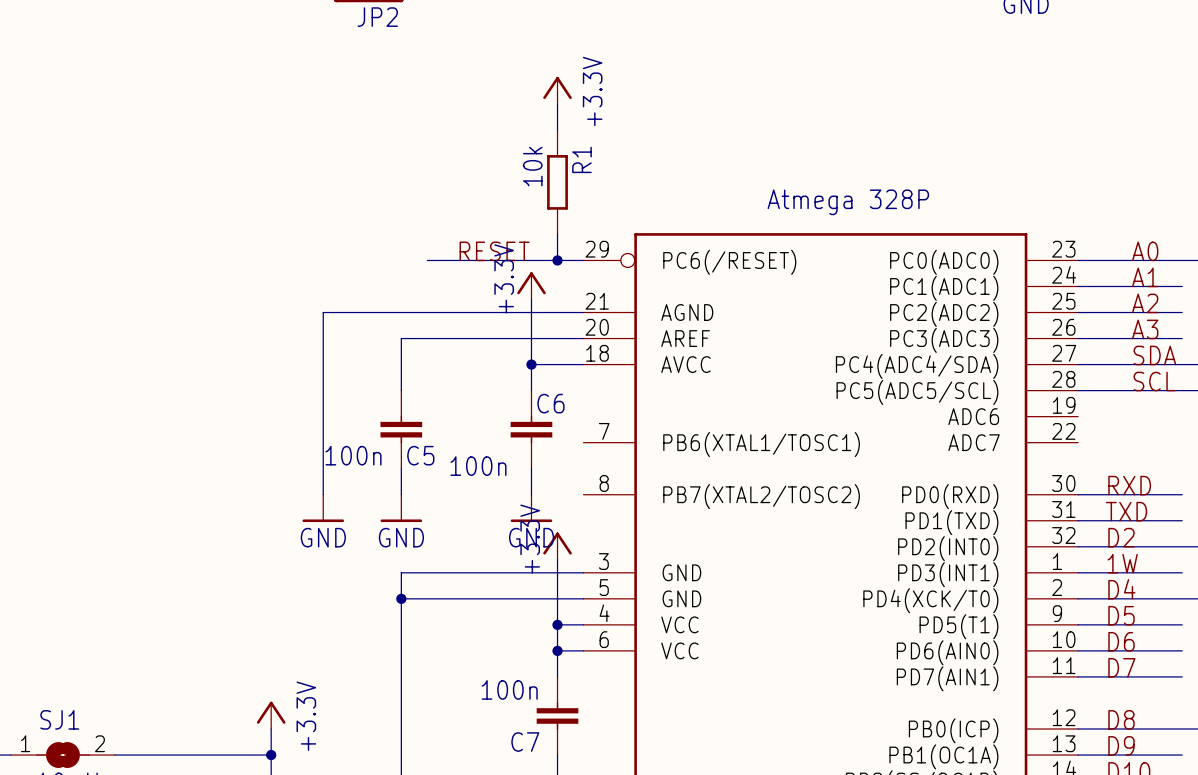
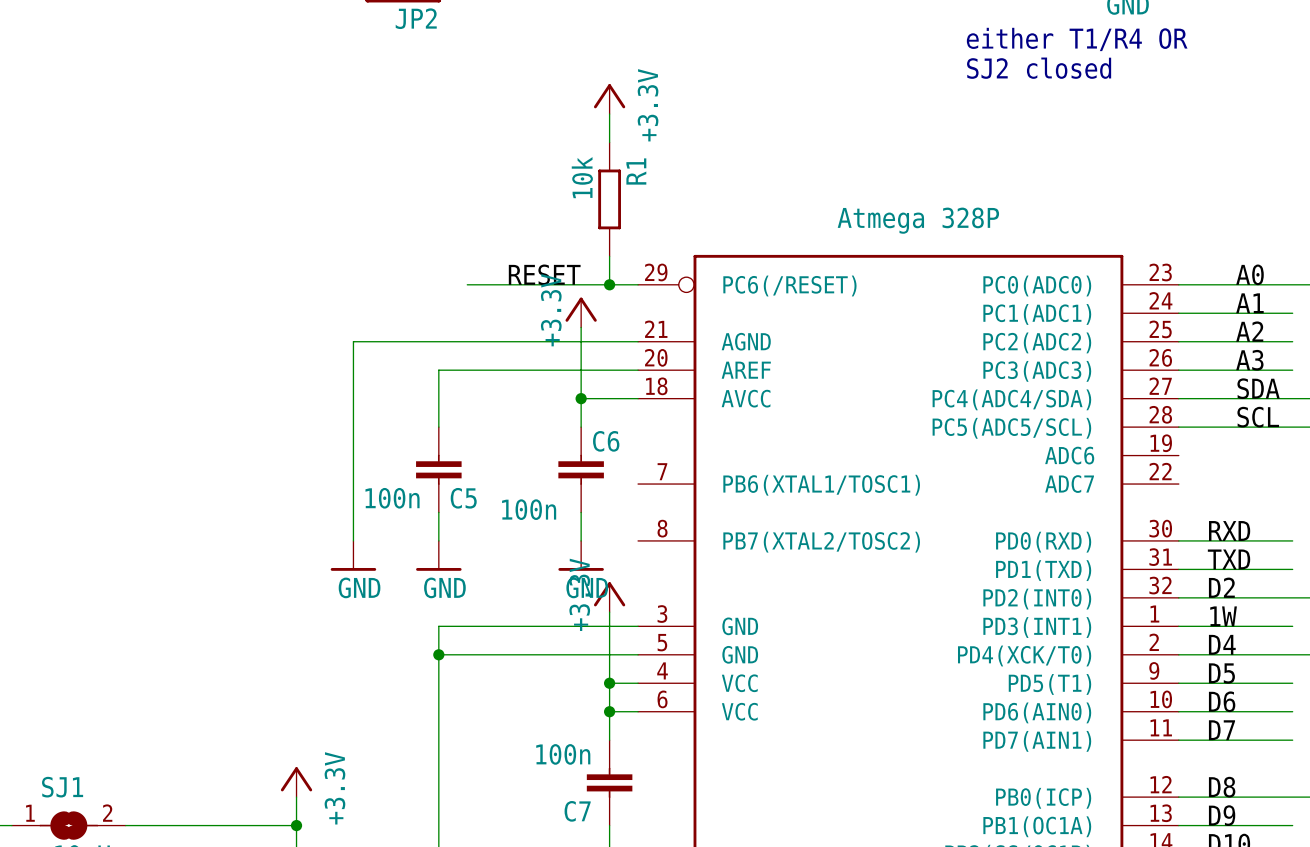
text: none -> either T1/R4 OR (1077, 39)
text: none -> SJ2 closed (1039, 68)

